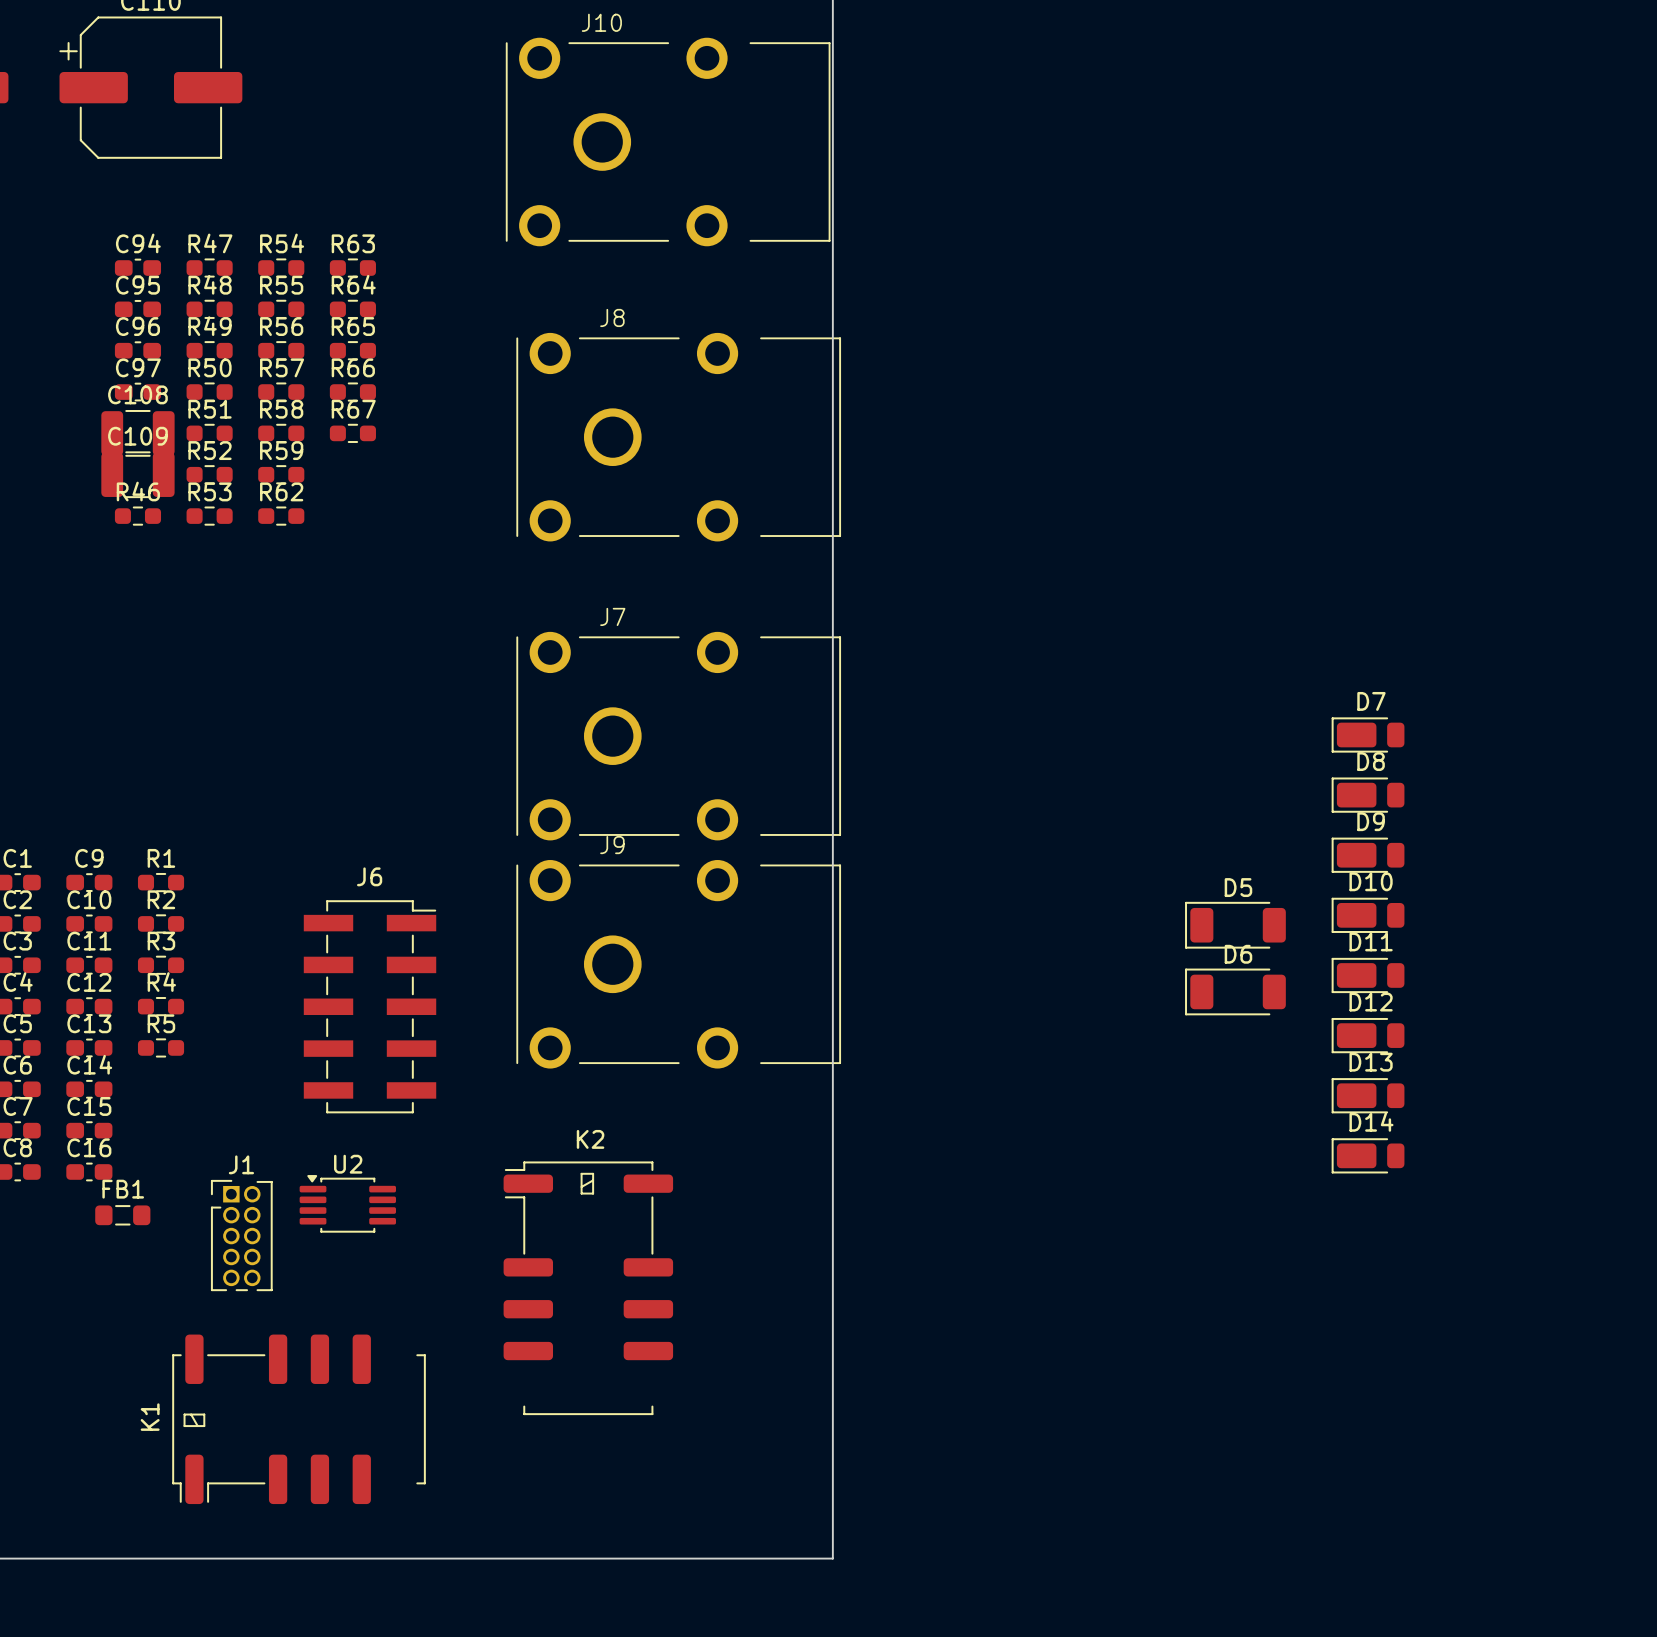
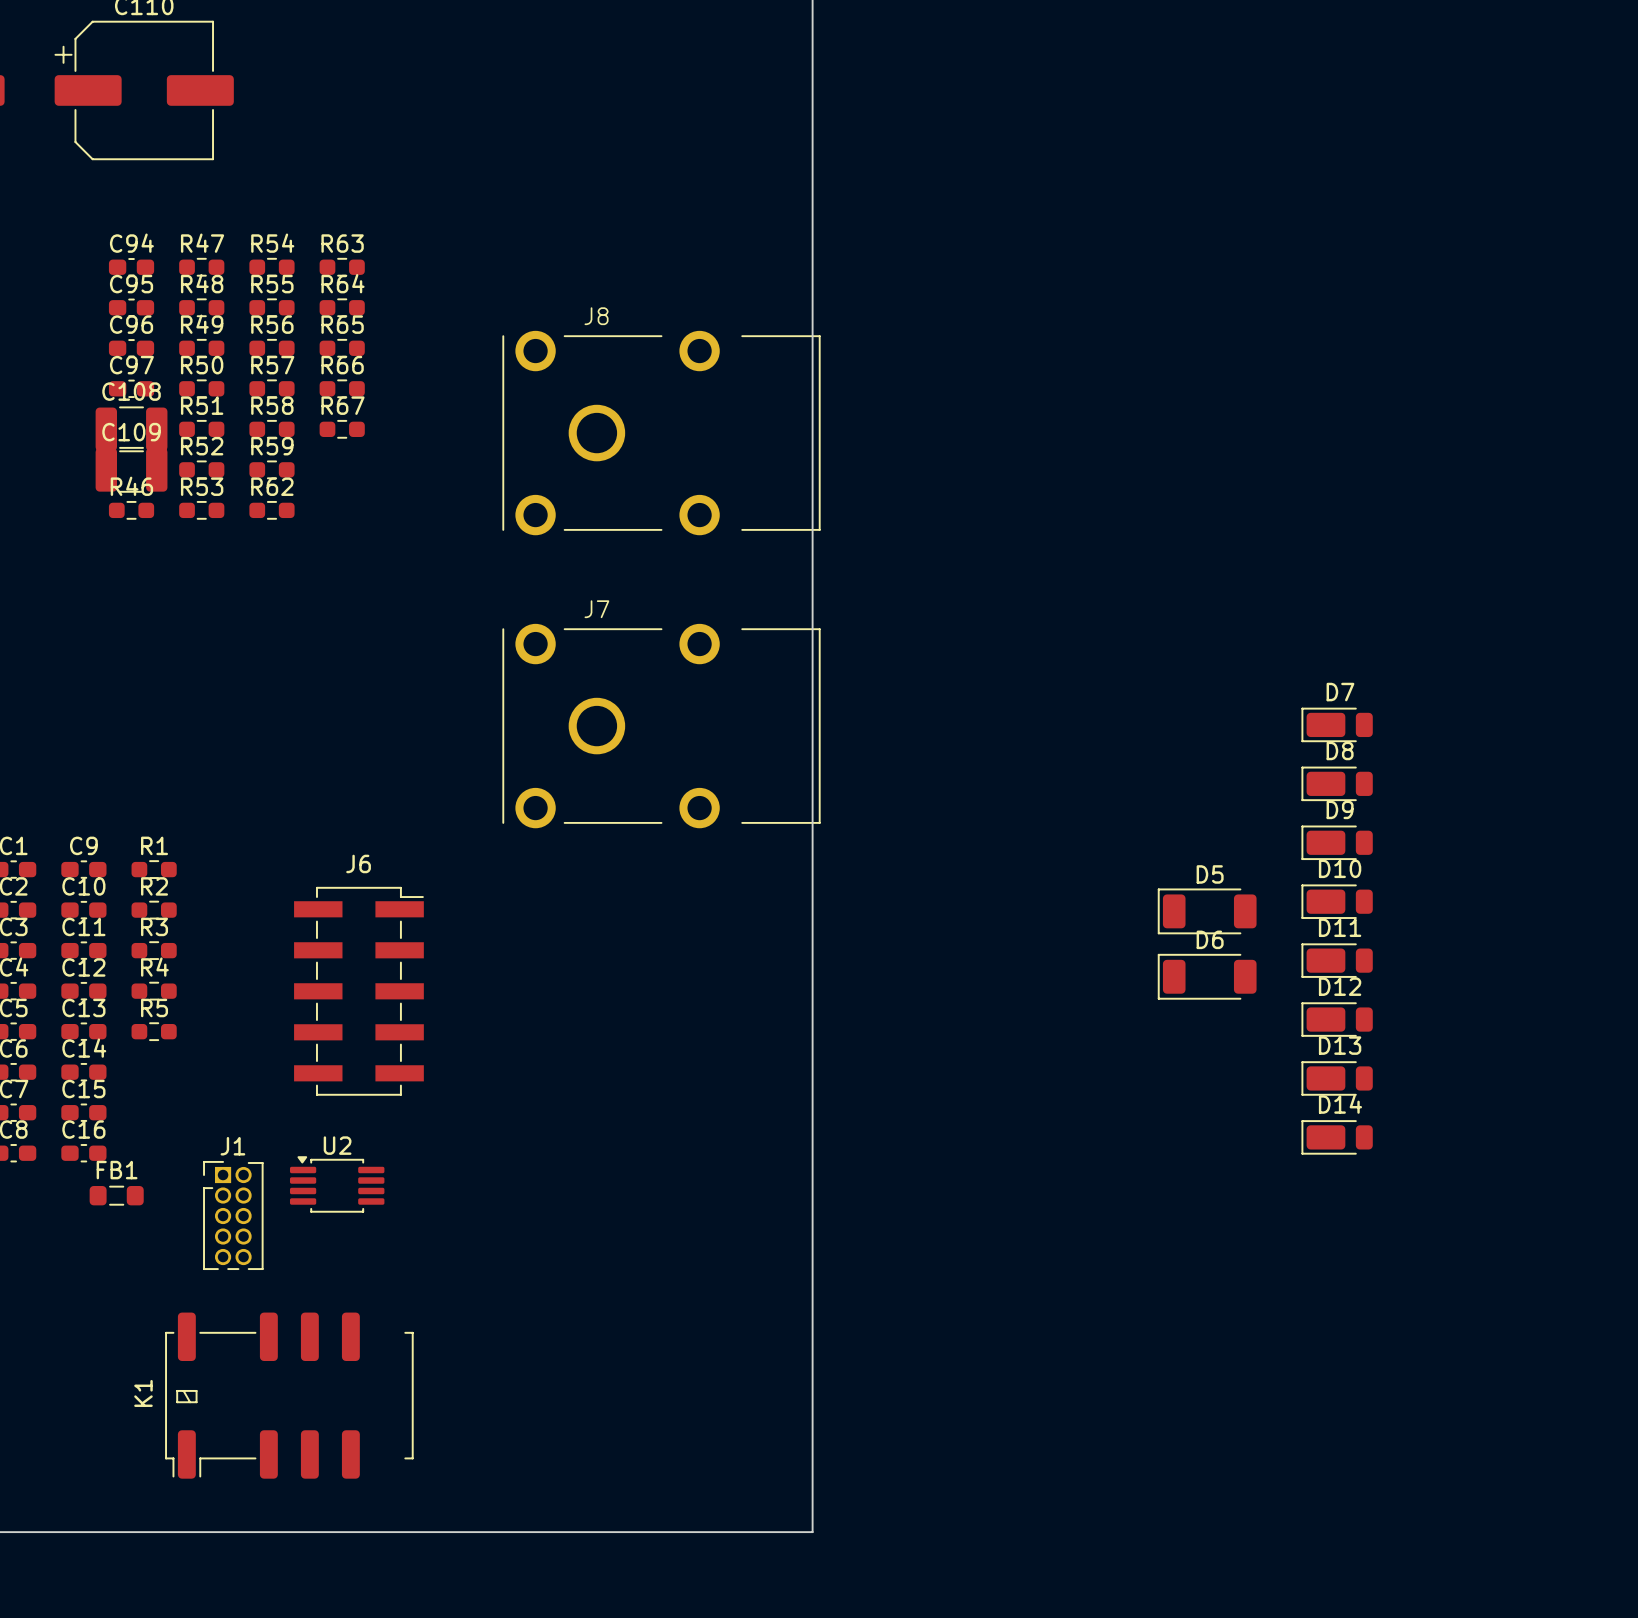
J10: (668, 142) -> none
J9: (678, 964) -> none
K2: (588, 1288) -> none

